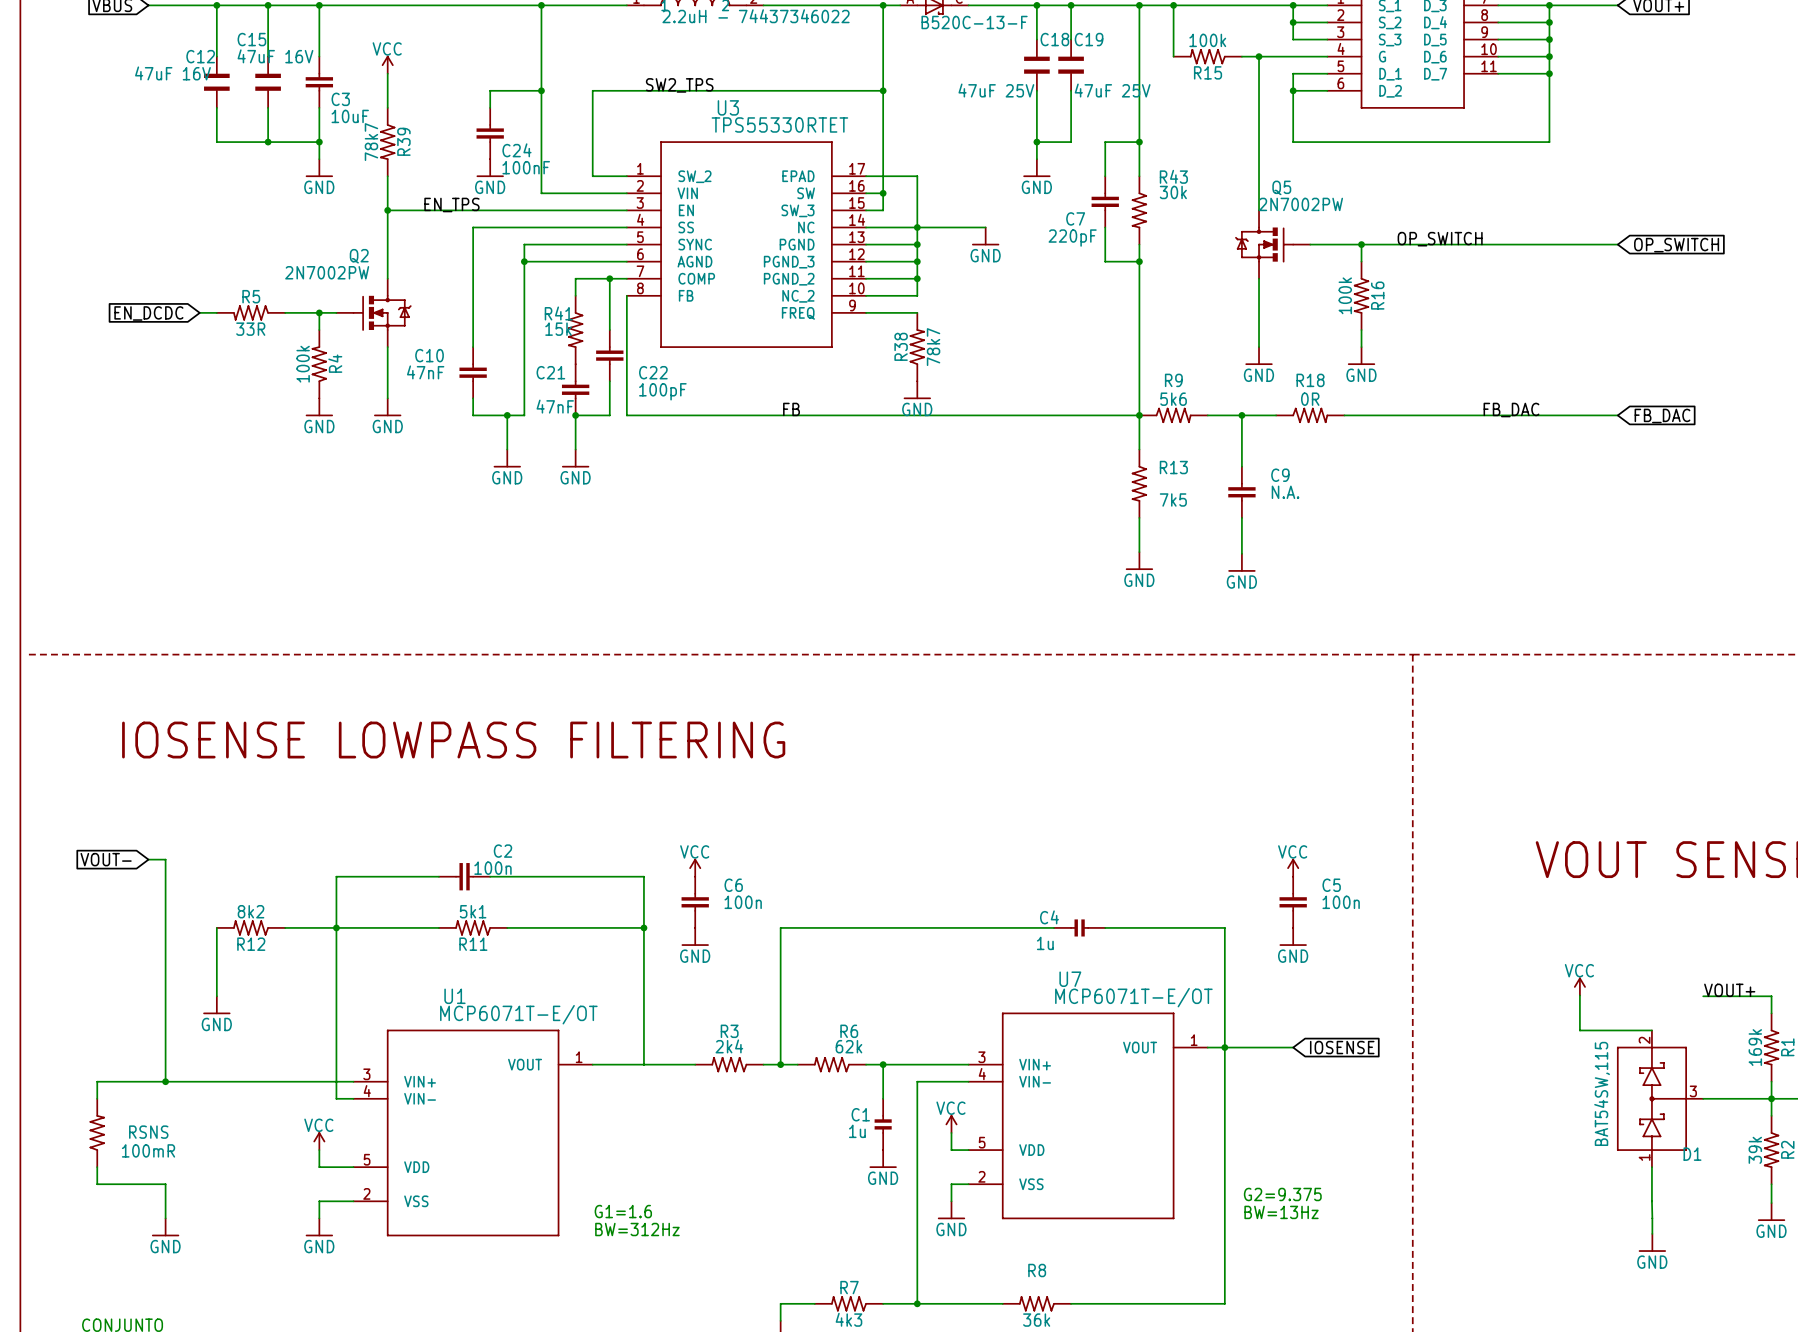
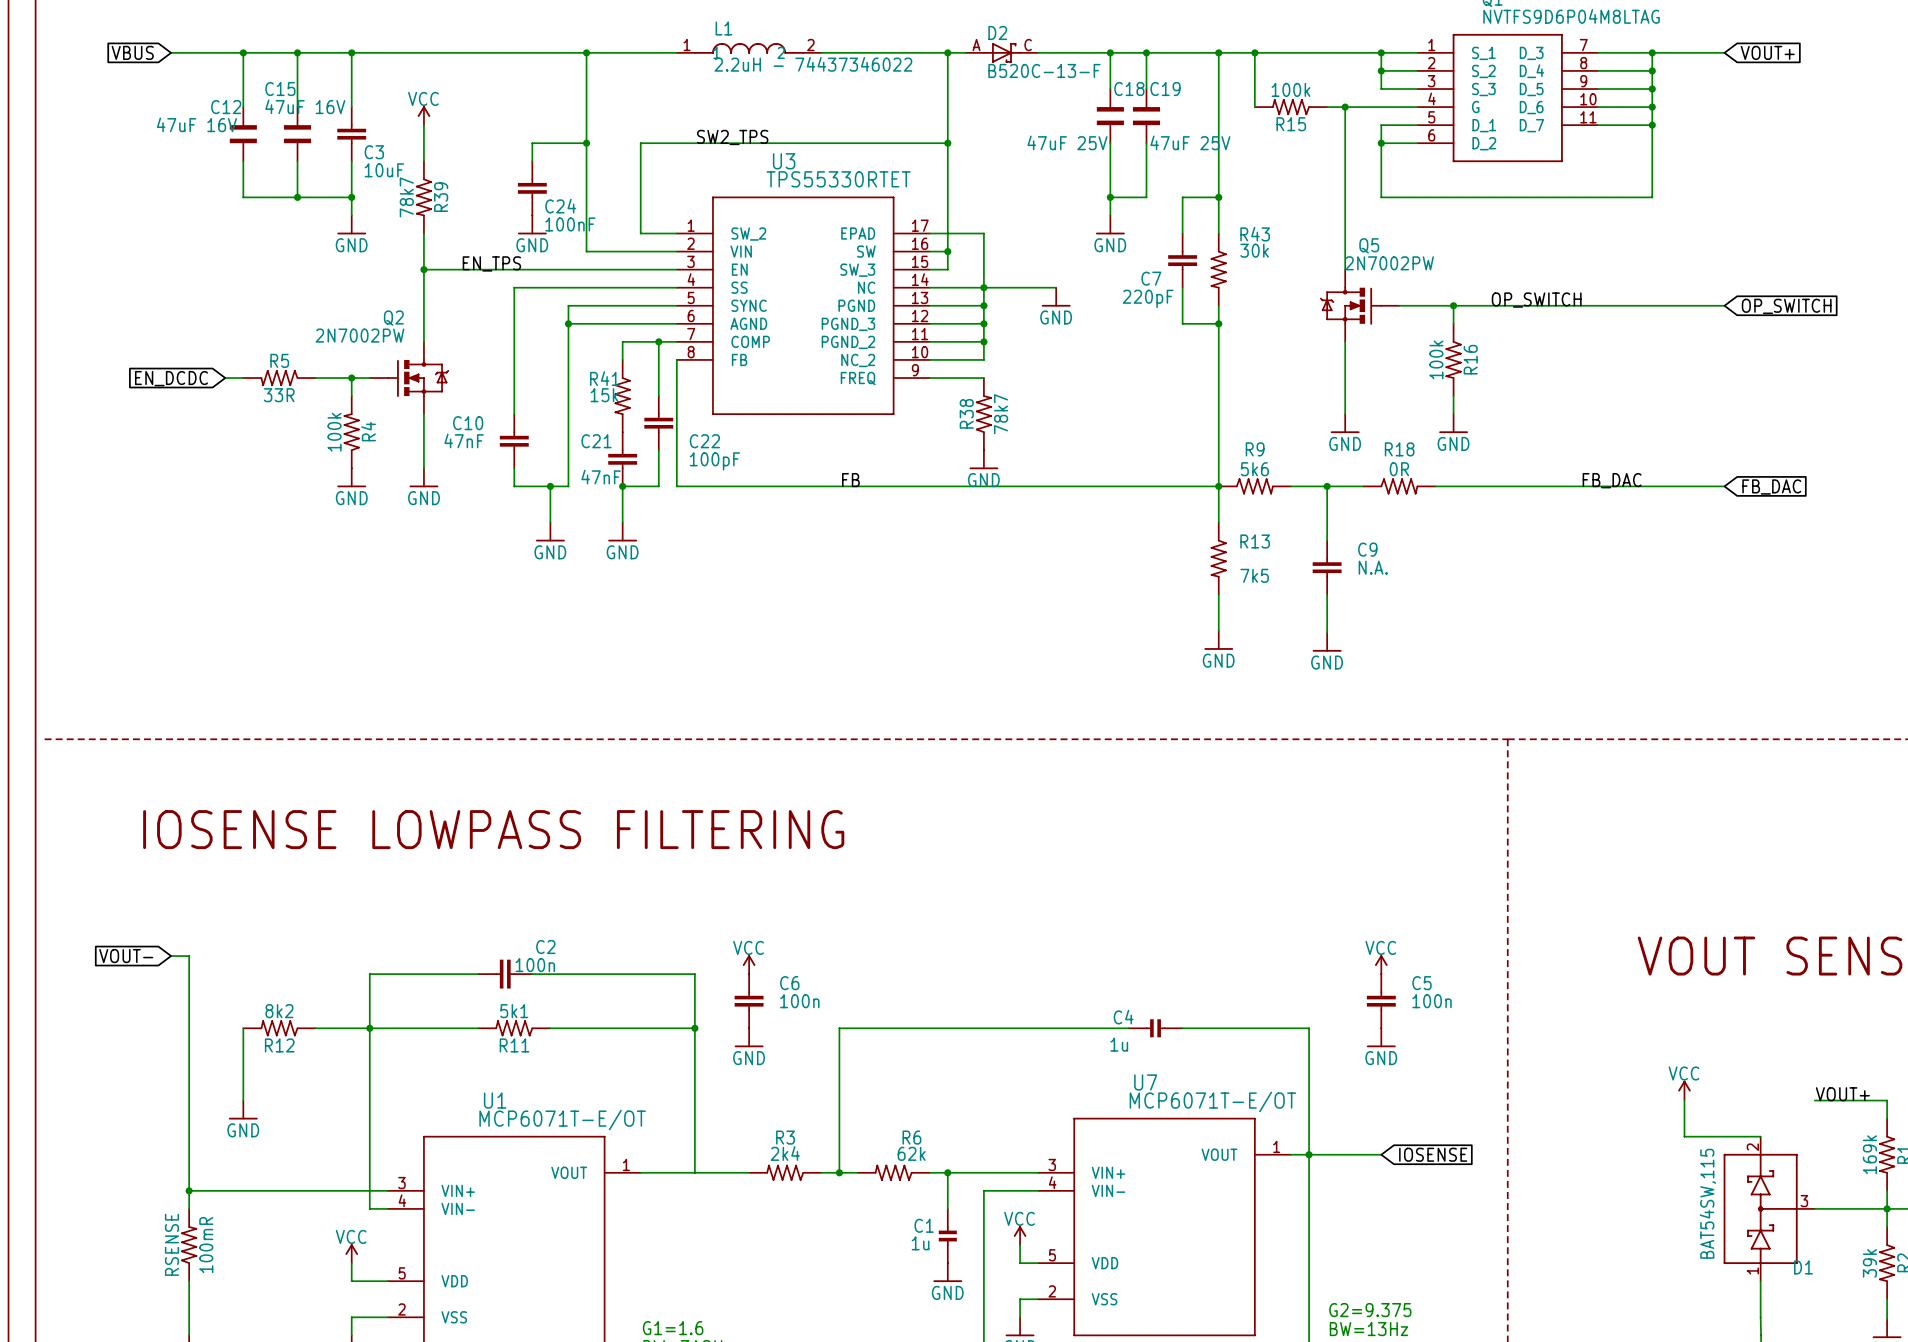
wire: (165, 1081) (97, 1081) (97, 1098) -> (189, 1190) (189, 1208)
RSNS: 100mR (97, 1132) -> none
RSENSE: none -> 100mR (189, 1245)
wire: (97, 1167) (97, 1184) (165, 1184) -> (189, 1281) (189, 1299)

